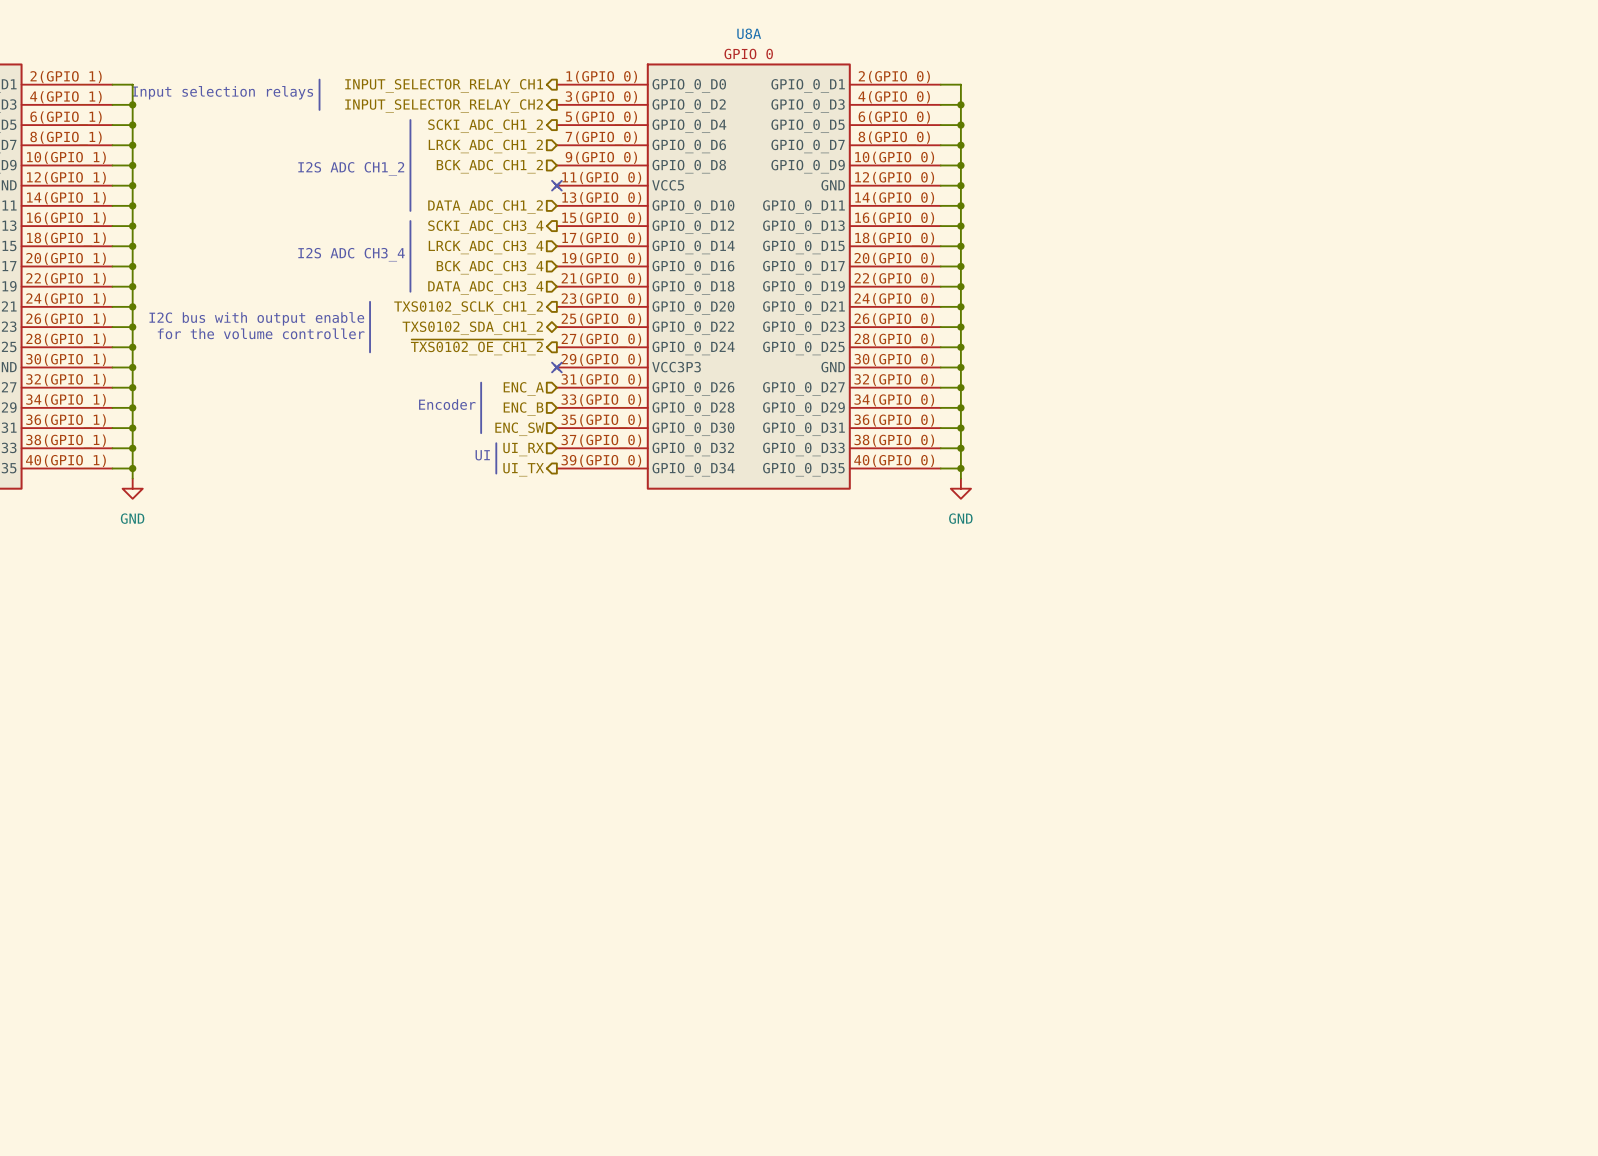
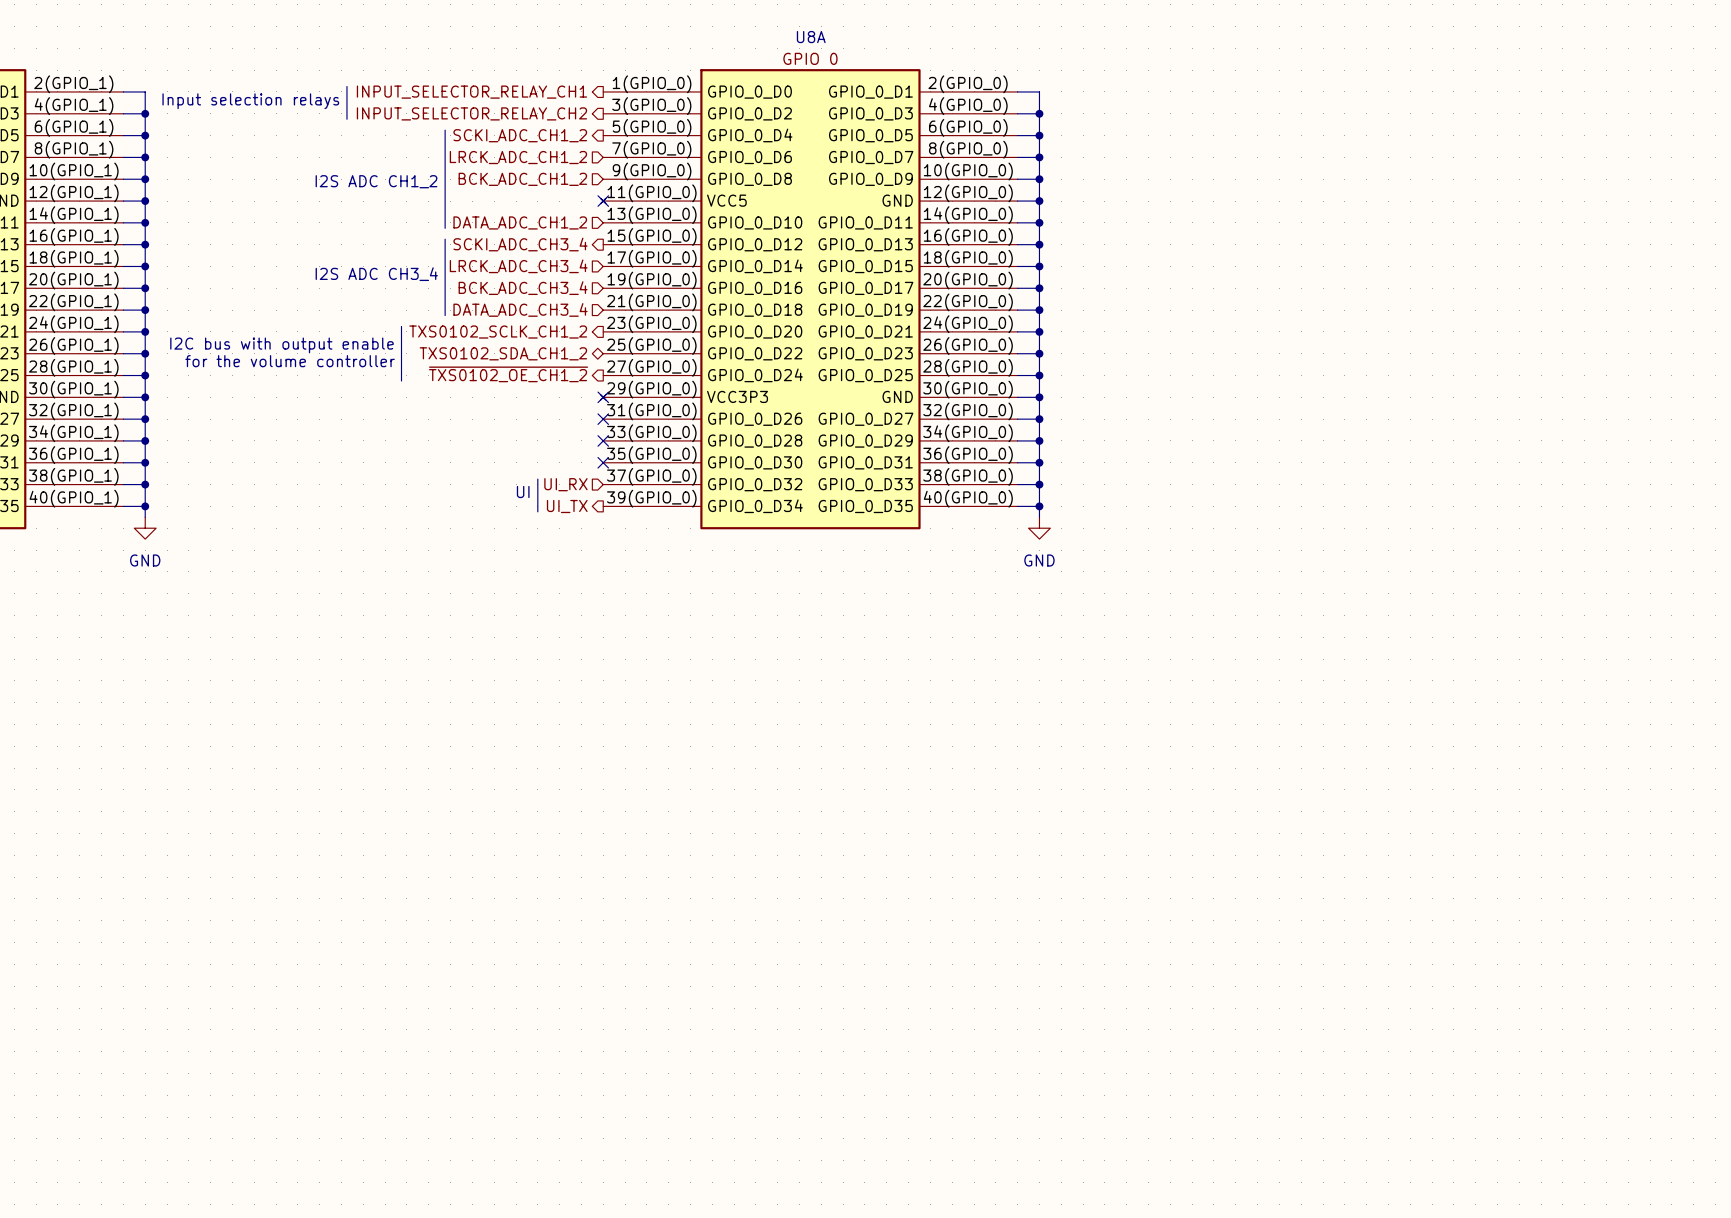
line: (481, 382) (481, 433) -> none
no-connect mark: none -> (603, 419)
hierarchical label: ENC_A (523, 388) -> none
text: Encoder (447, 404) -> none
no-connect mark: none -> (603, 440)
hierarchical label: ENC_B (523, 409) -> none
no-connect mark: none -> (603, 462)
hierarchical label: ENC_SW (519, 429) -> none

